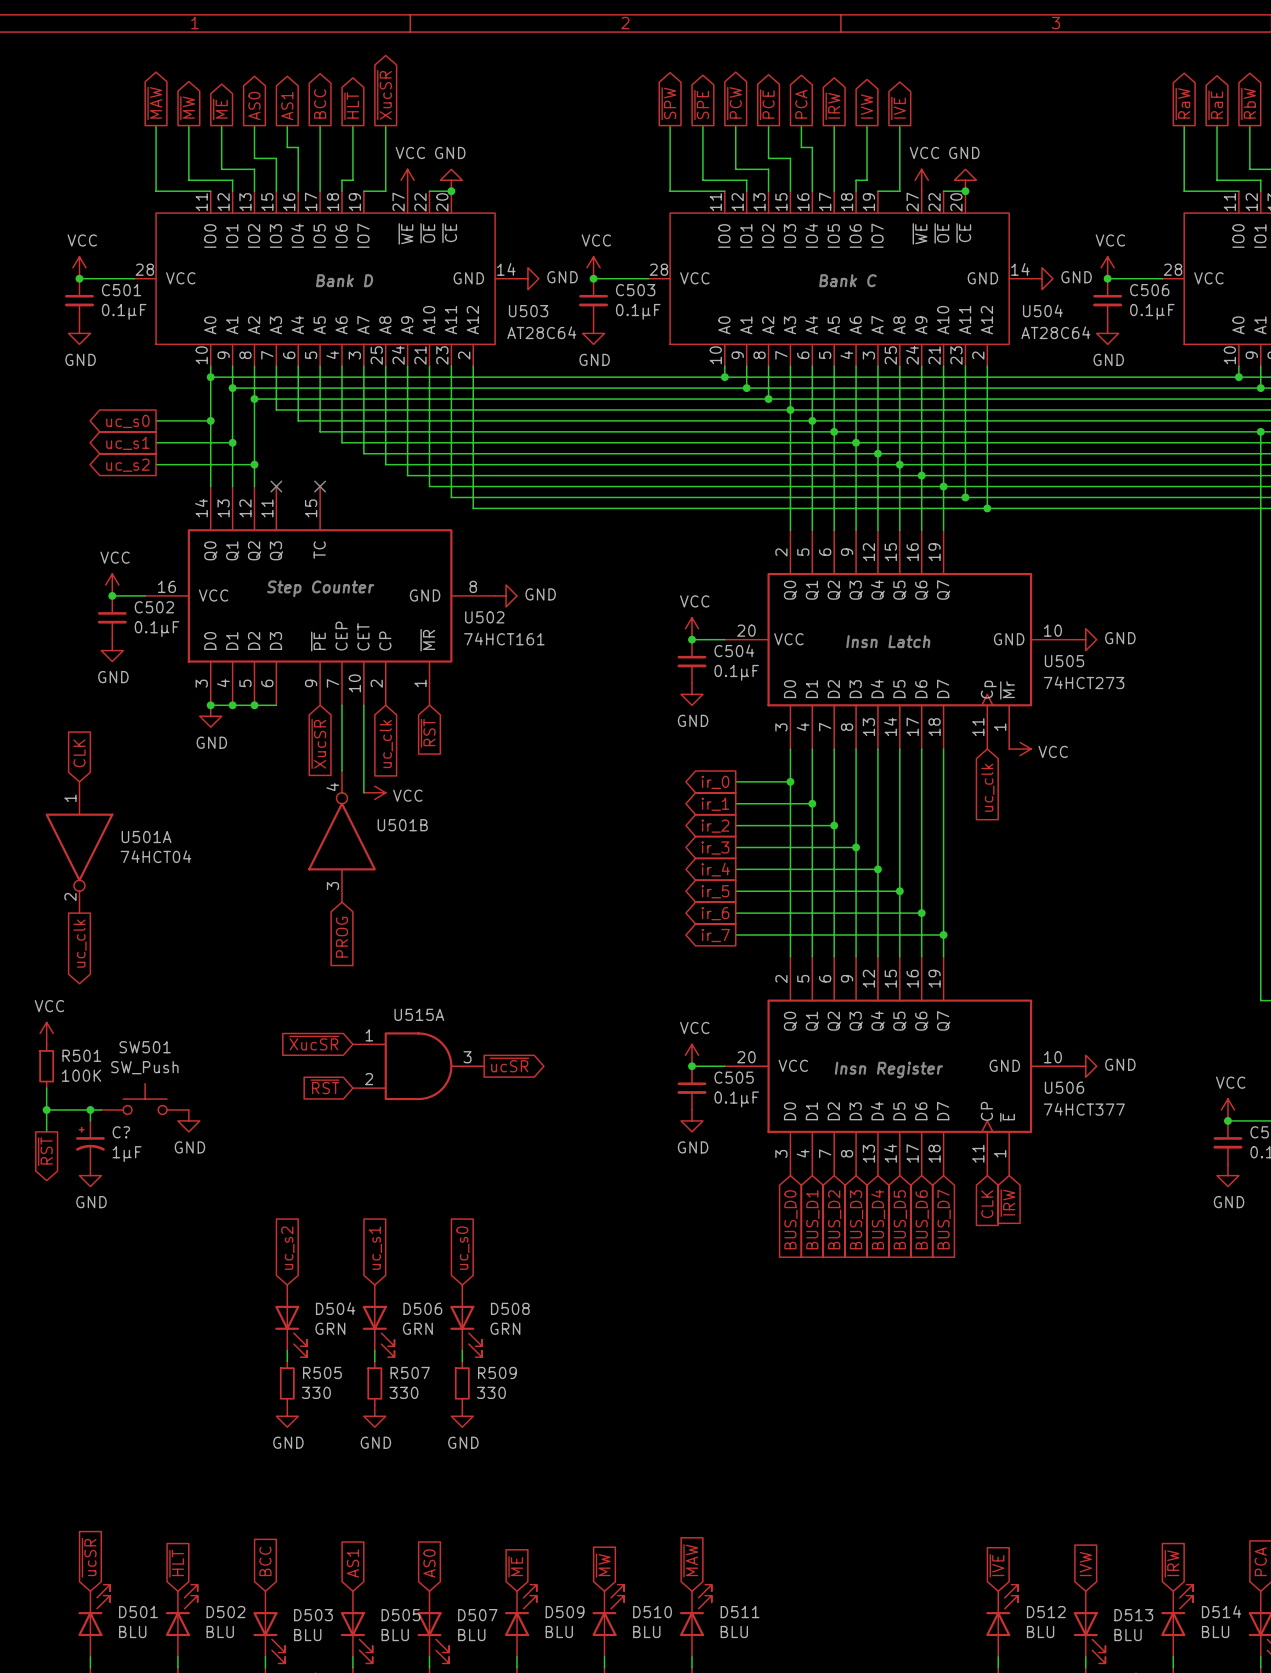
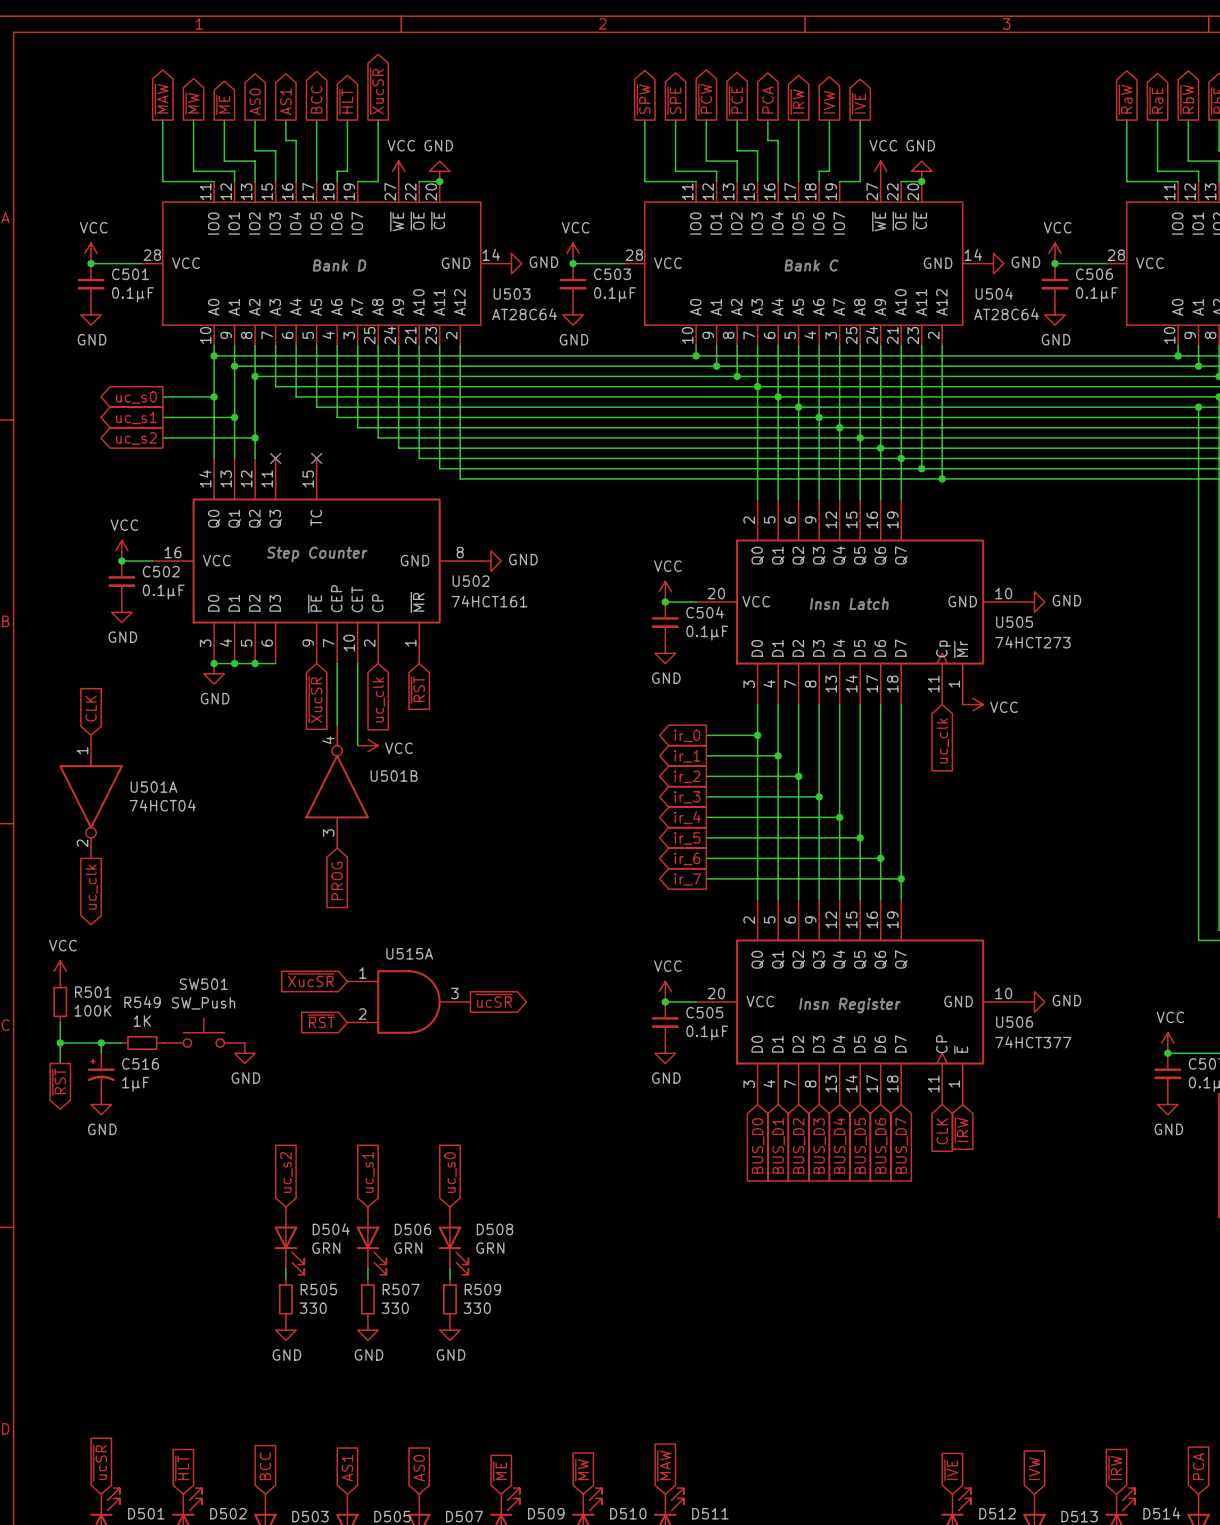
SW501 position: (145, 1099) -> (203, 1032)
R549: none -> 1K (142, 1043)
power symbol position: GND (188, 1120) -> GND (244, 1053)
C? name: C? (121, 1132) -> C516 (140, 1063)

